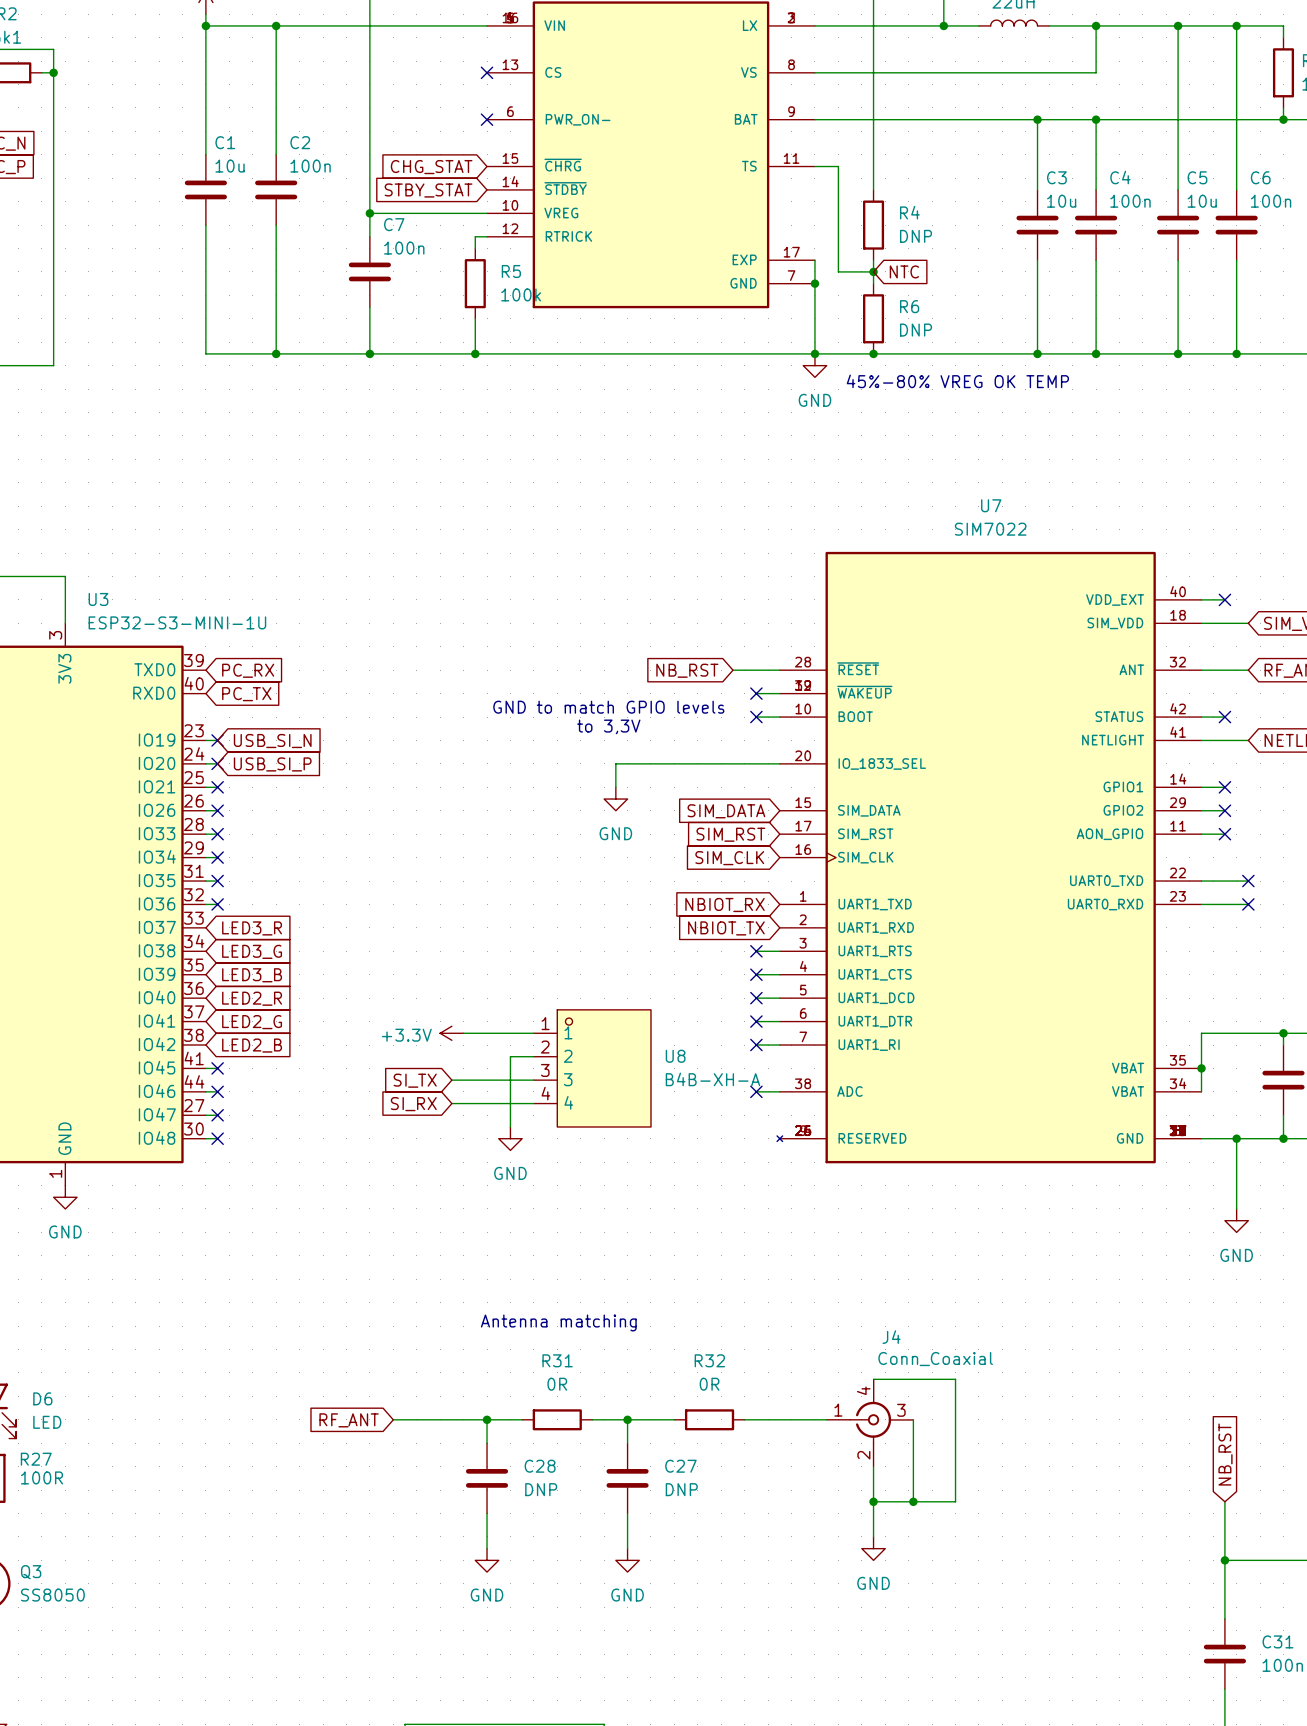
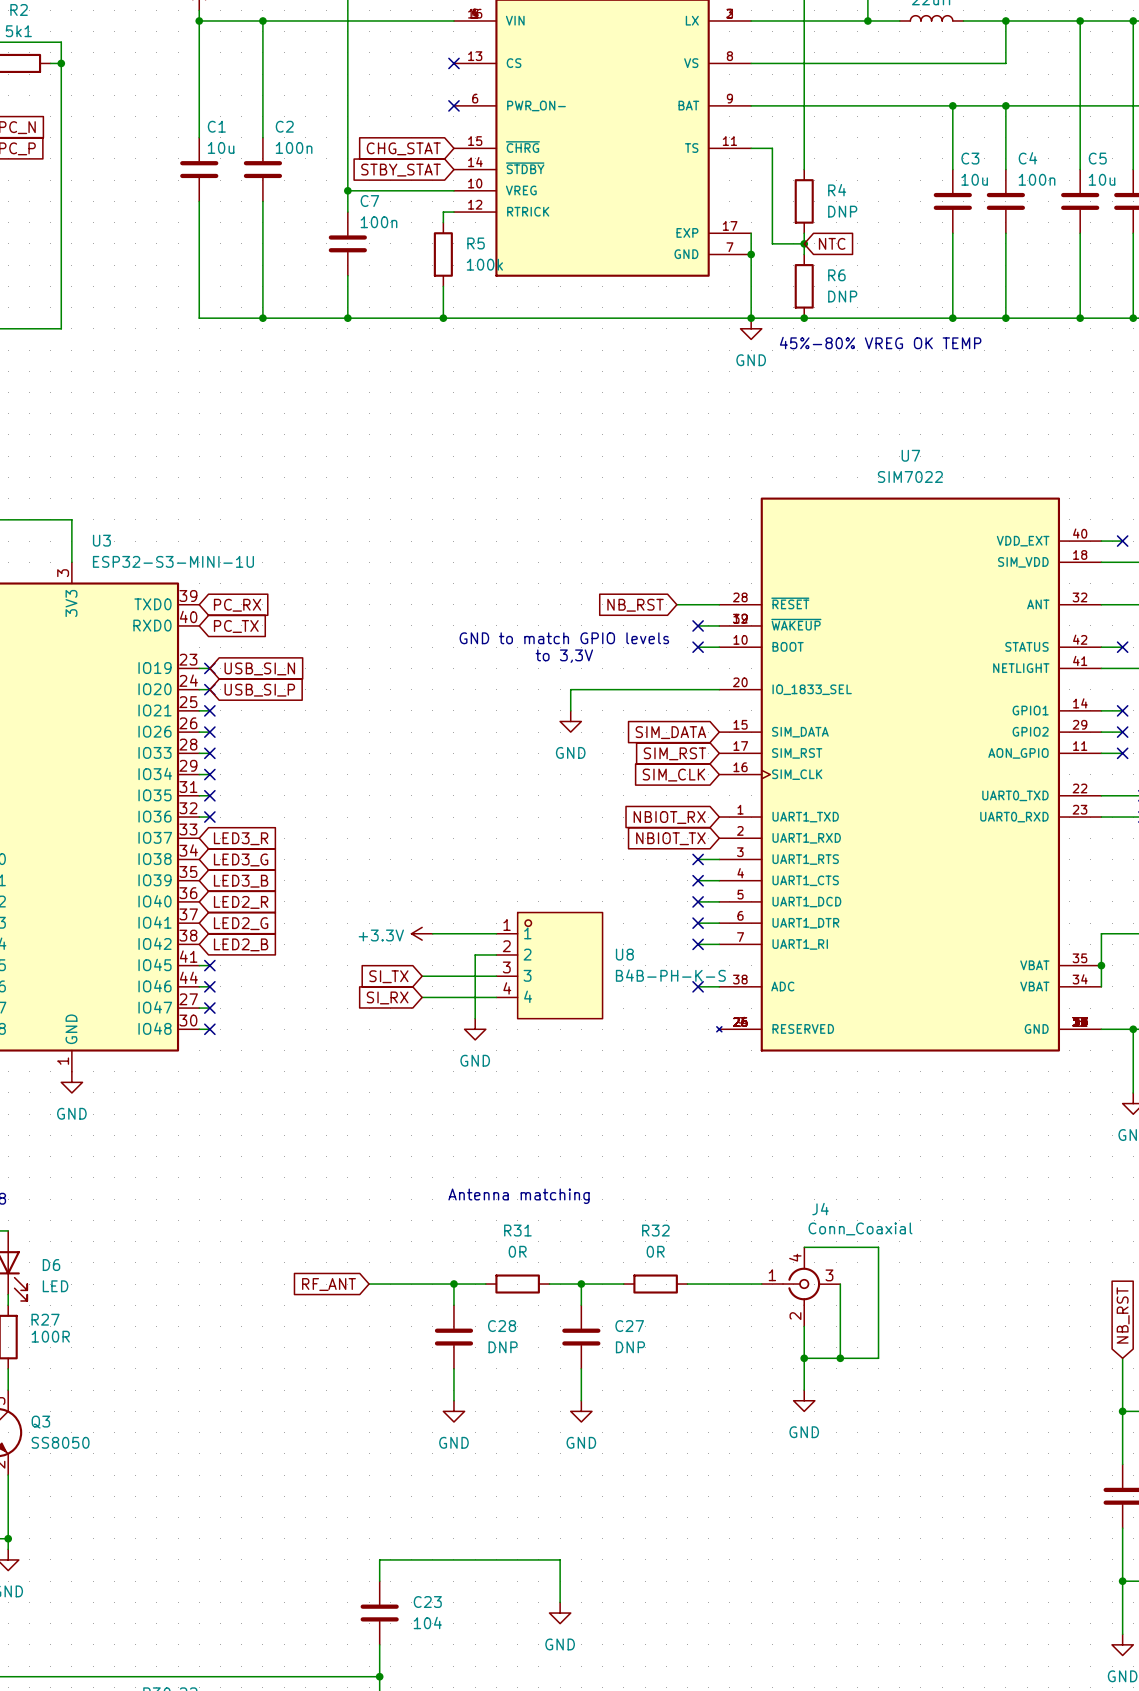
U8 value: B4B-XH-A (712, 1079) -> B4B-PH-K-S (670, 975)

